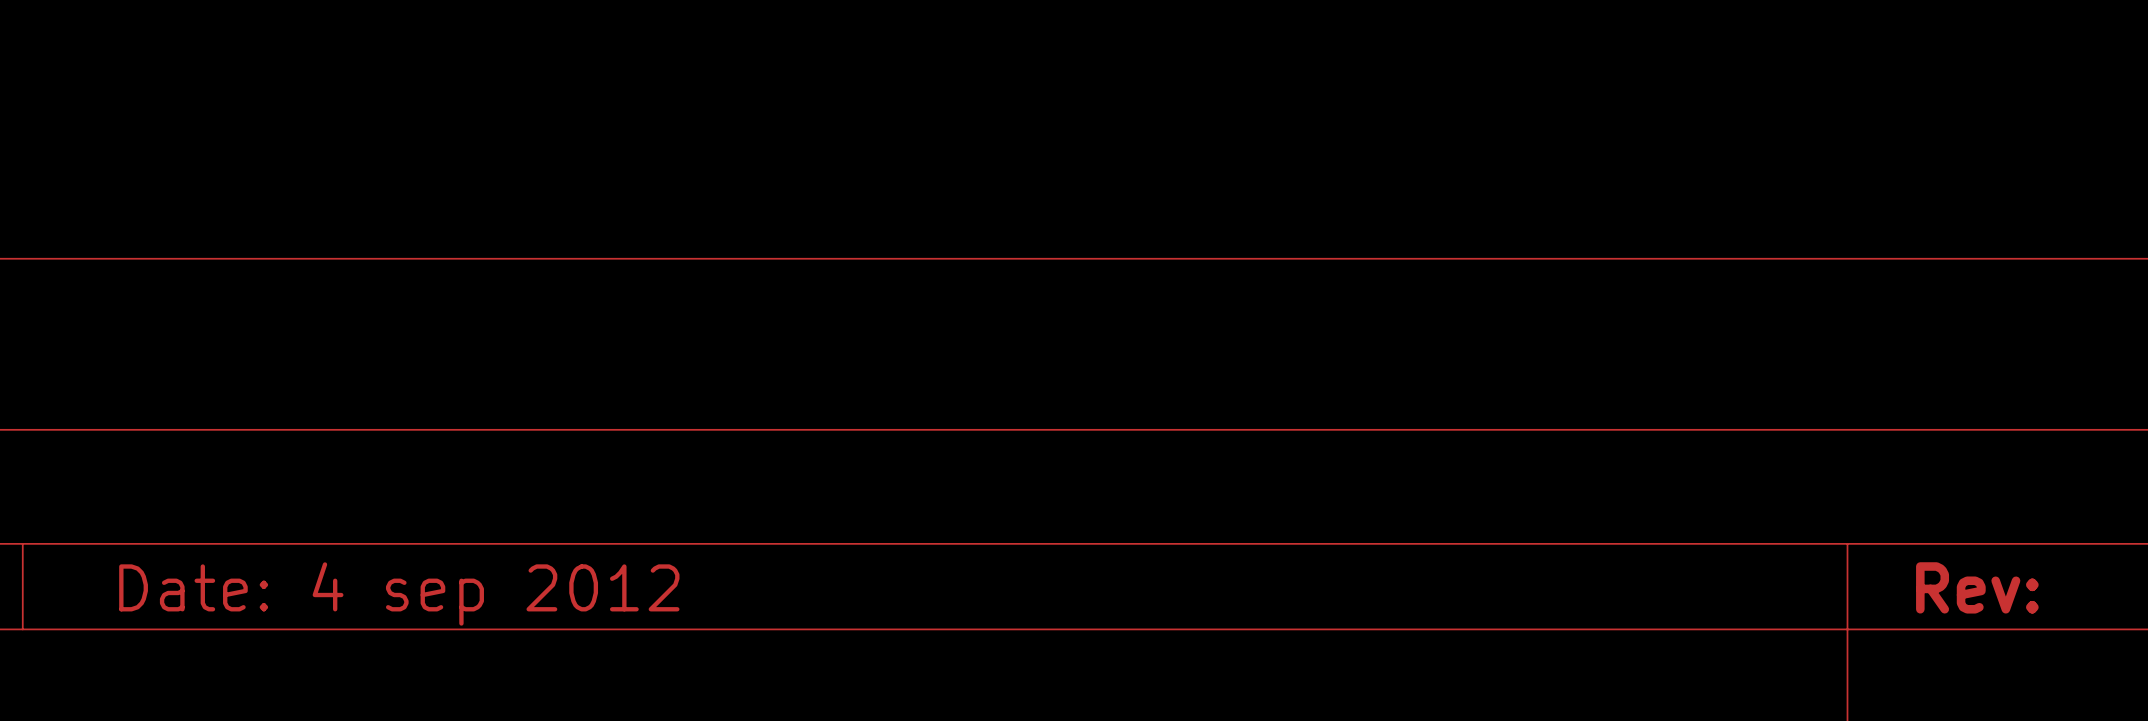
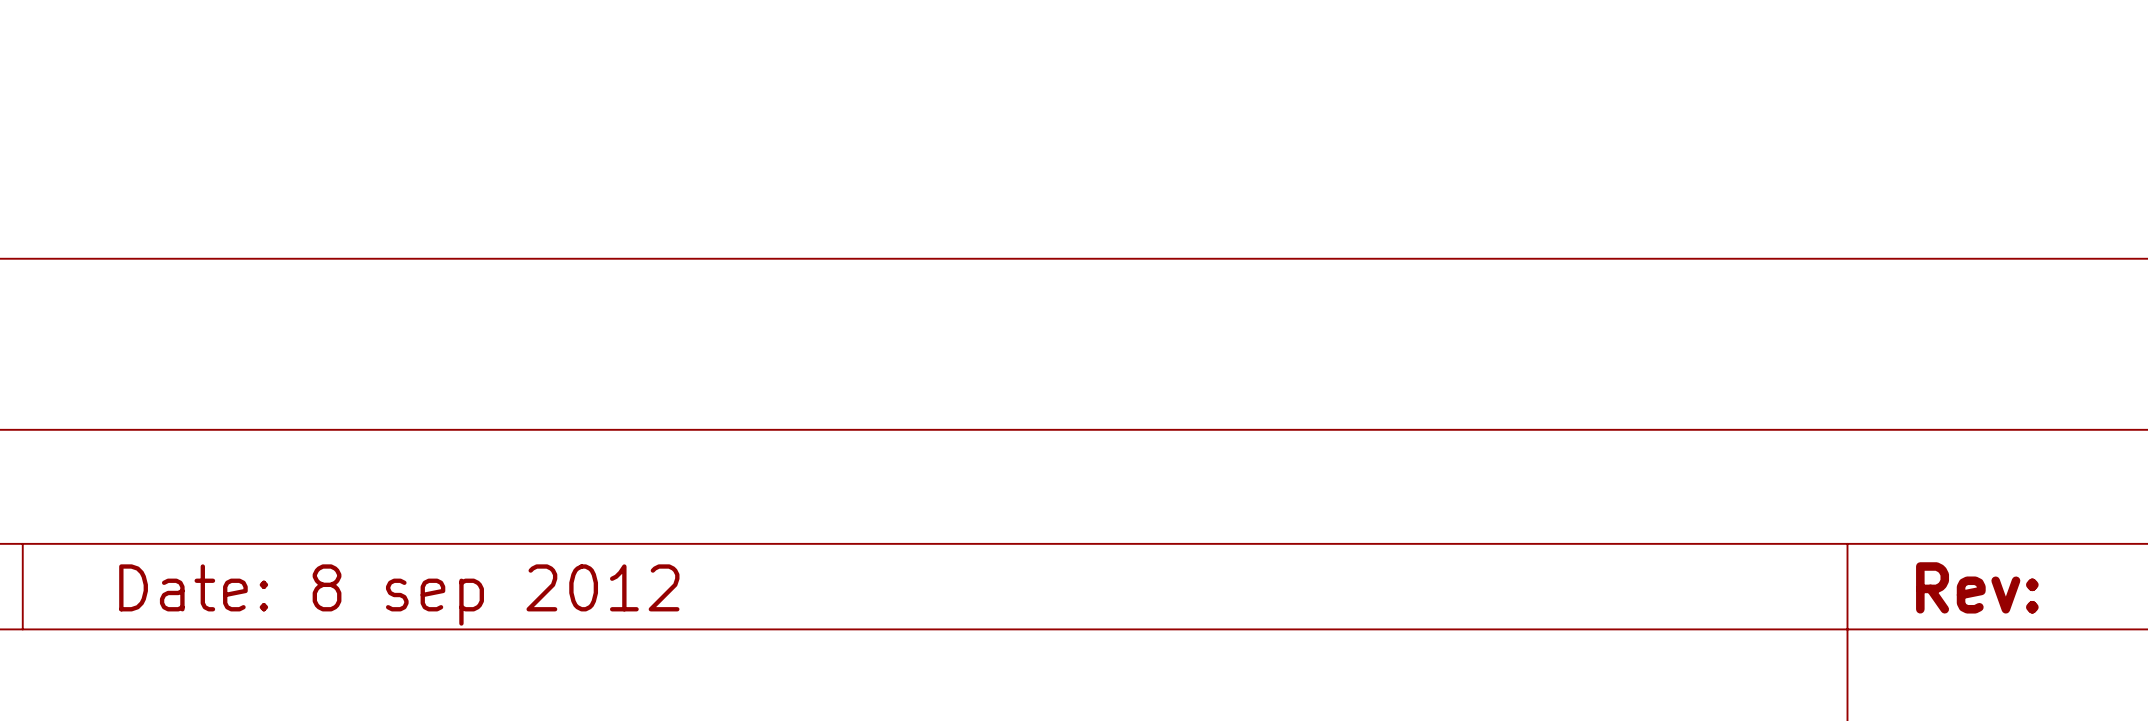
title block: Date: 4 sep 2012 (399, 594) -> Date: 8 sep 2012 (399, 595)

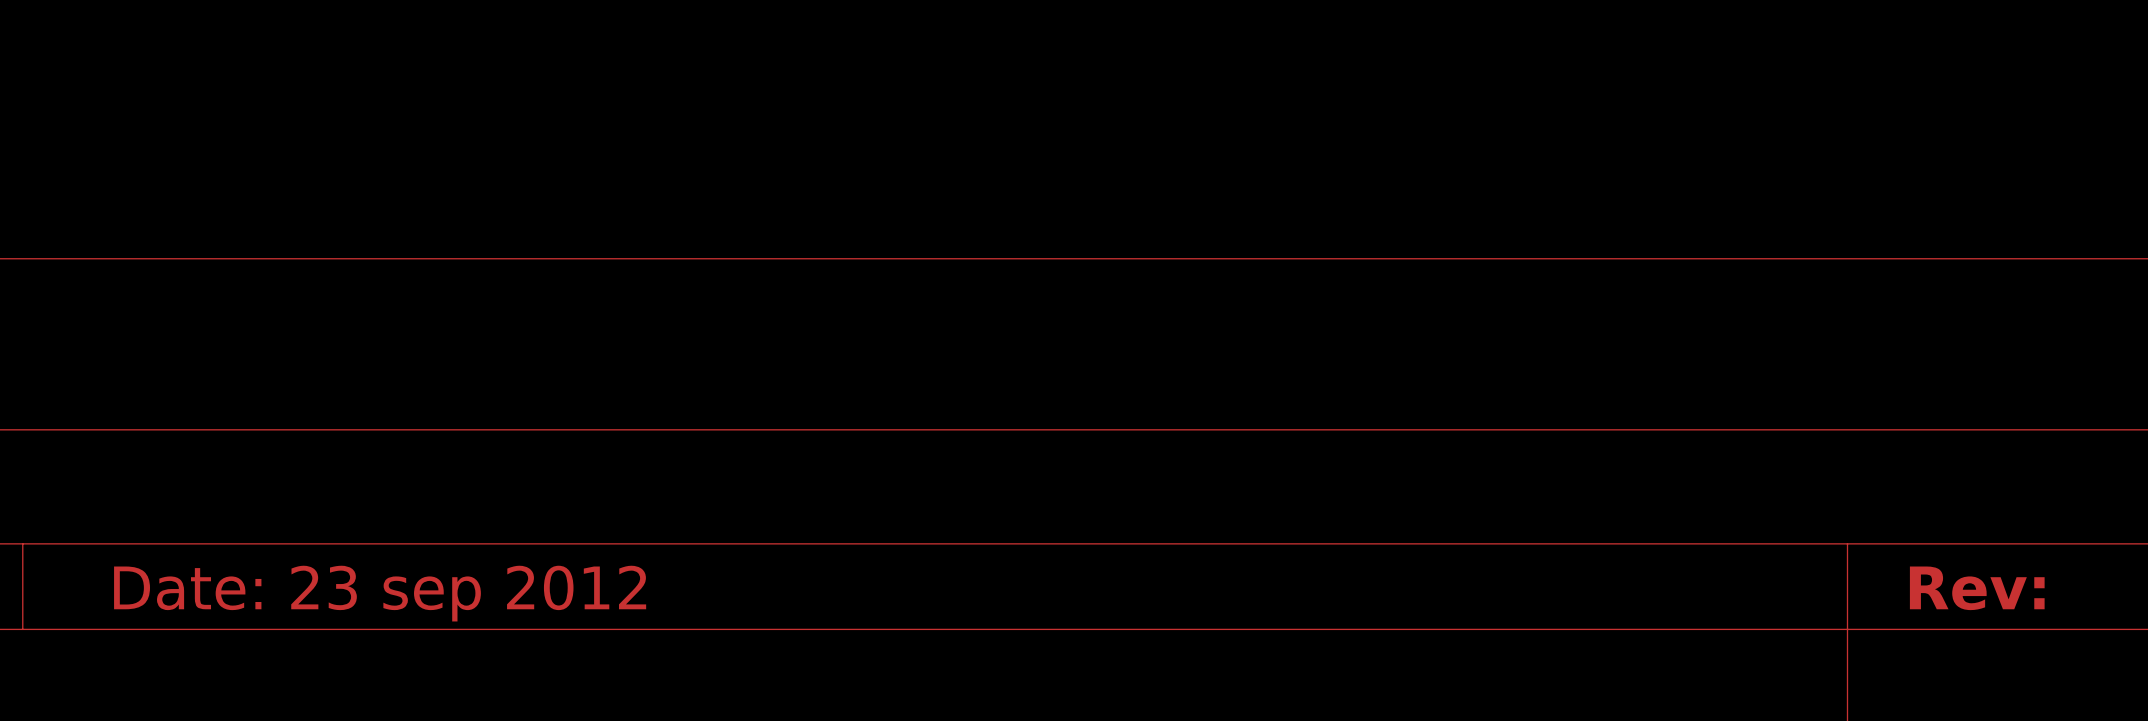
title block: Date: 8 sep 2012 (399, 595) -> Date: 23 sep 2012 (380, 593)

